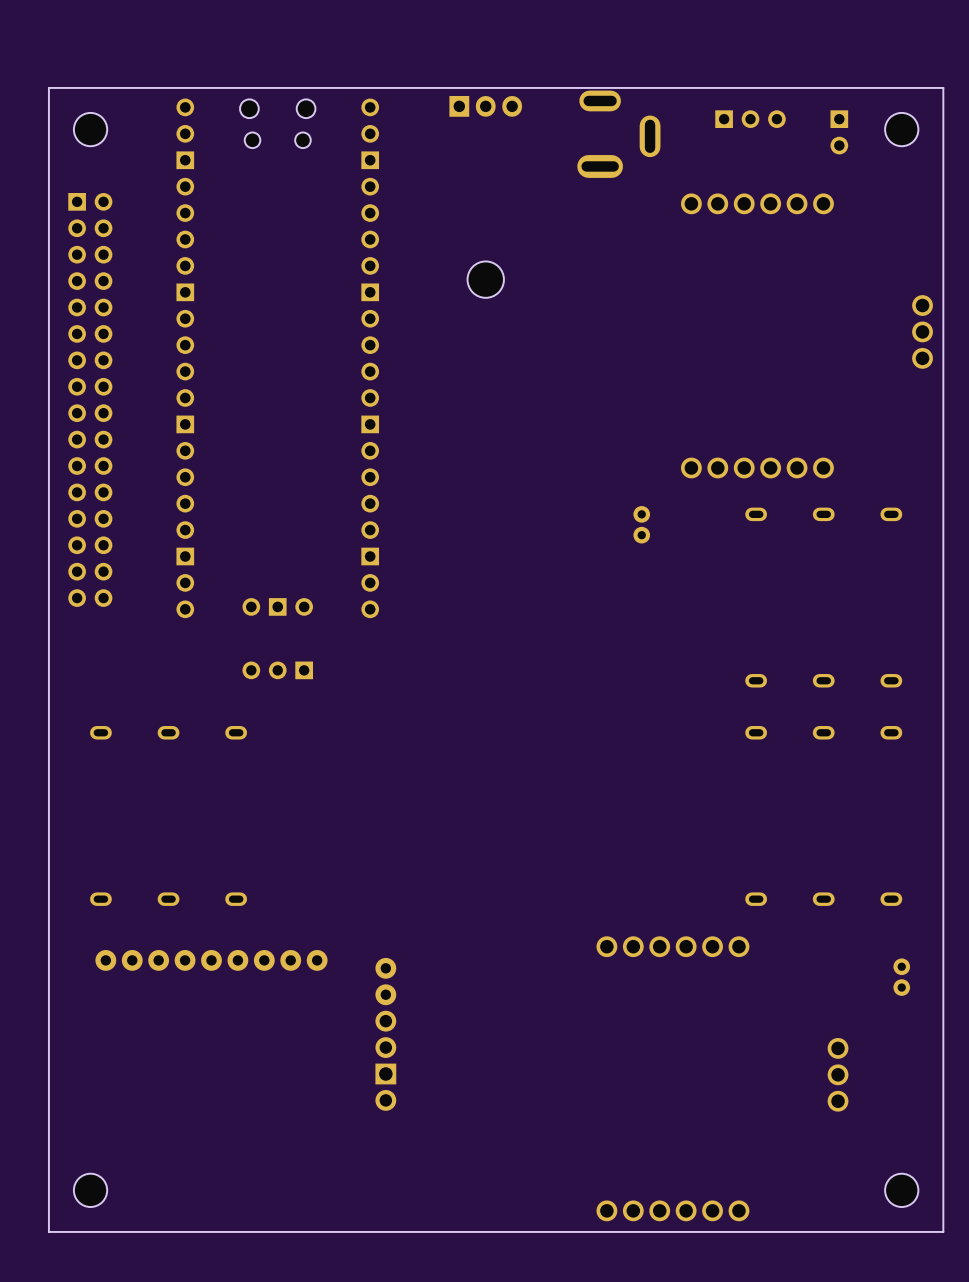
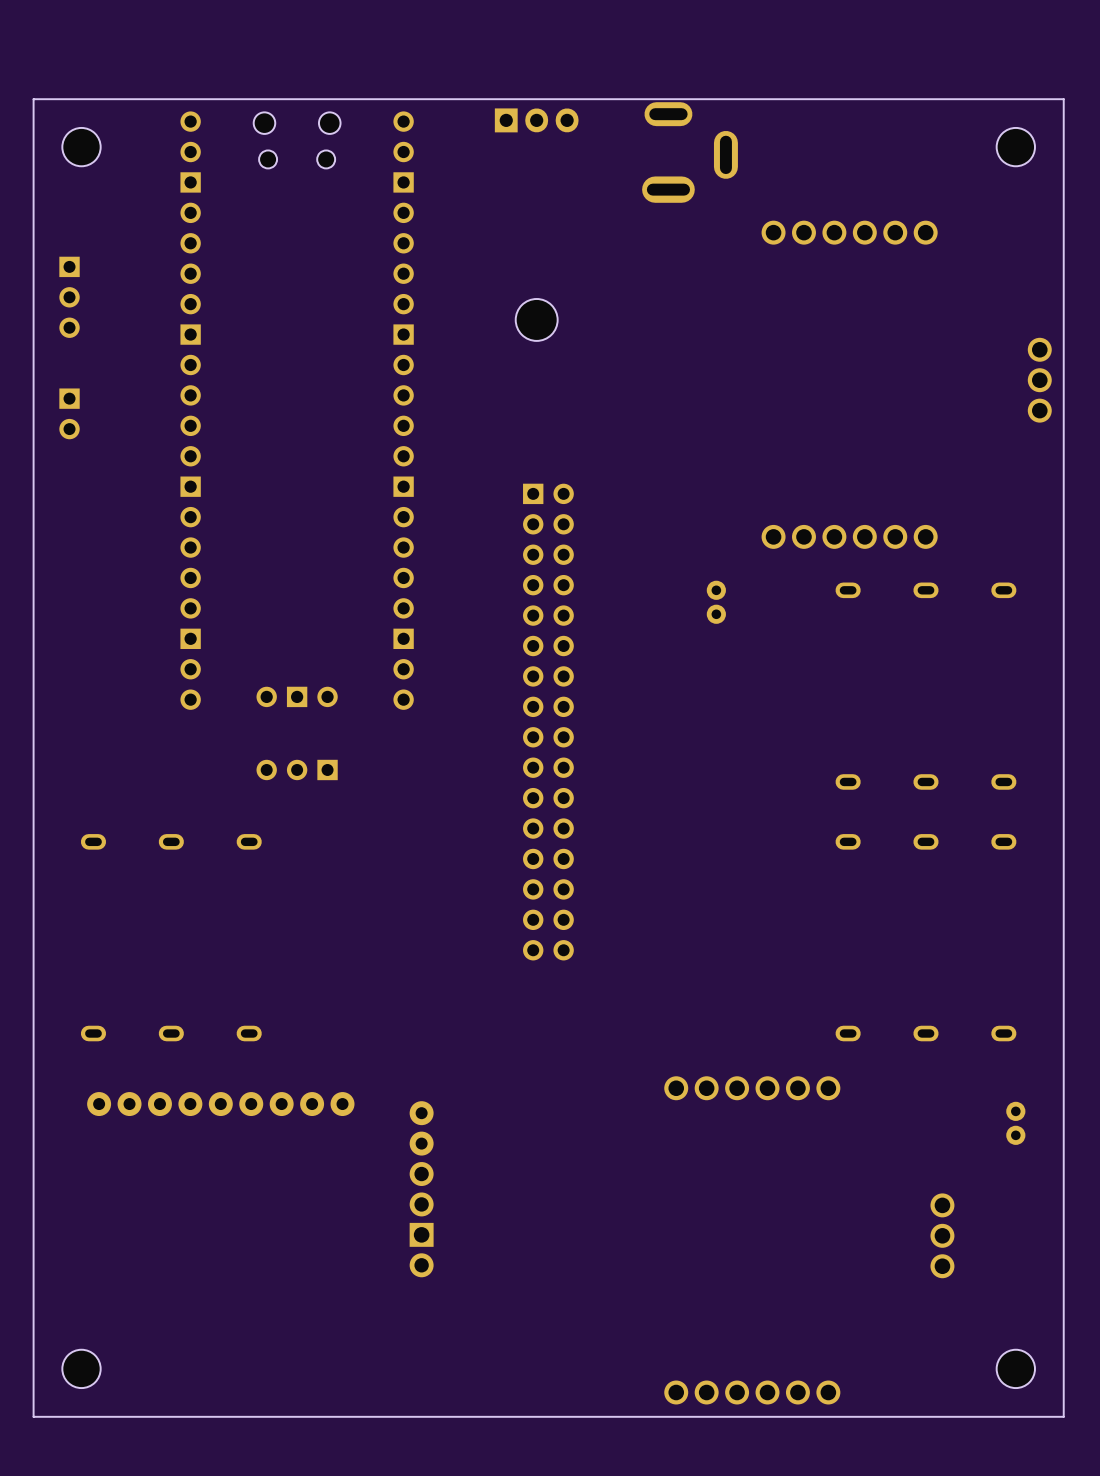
part: (750, 119) -> none
part: (839, 132) -> none
part: none -> (69, 297)
part: none -> (69, 413)
part: (90, 399) -> none
part: none -> (548, 722)

